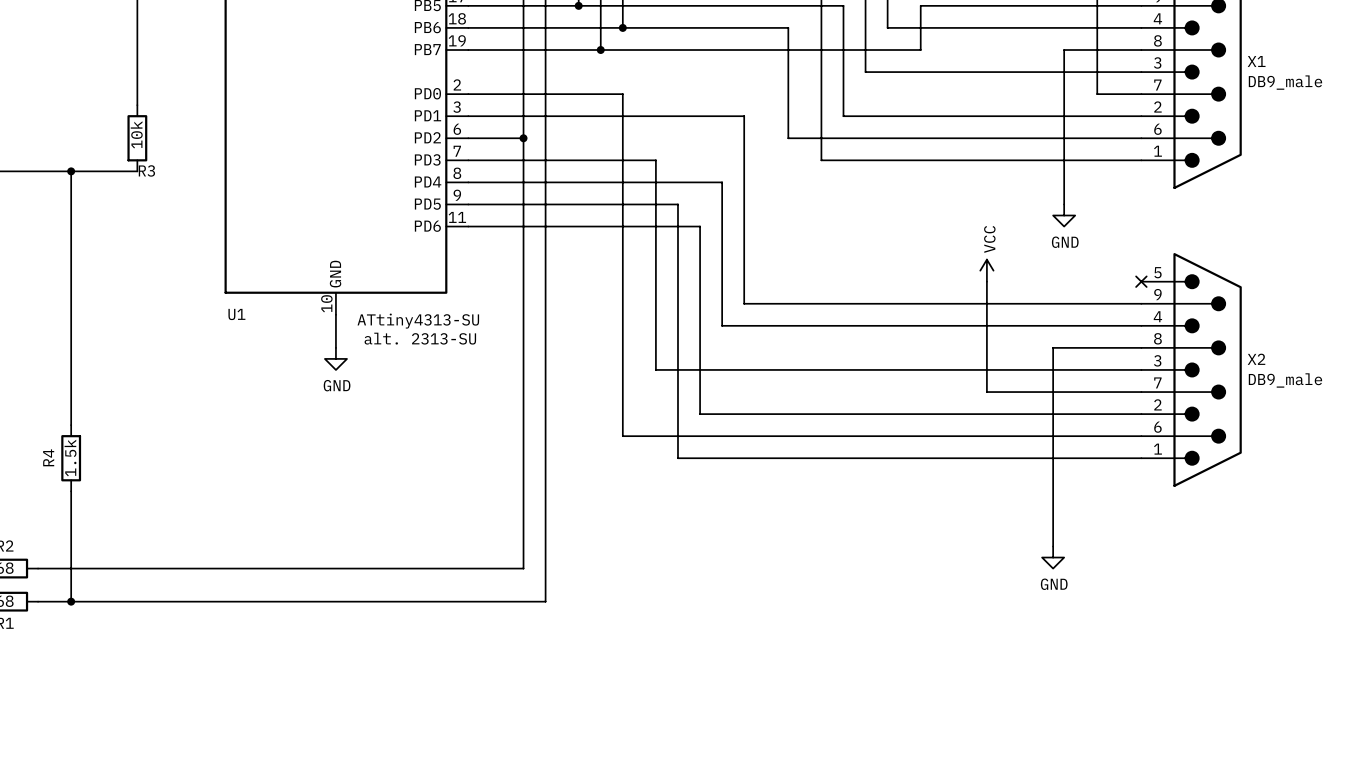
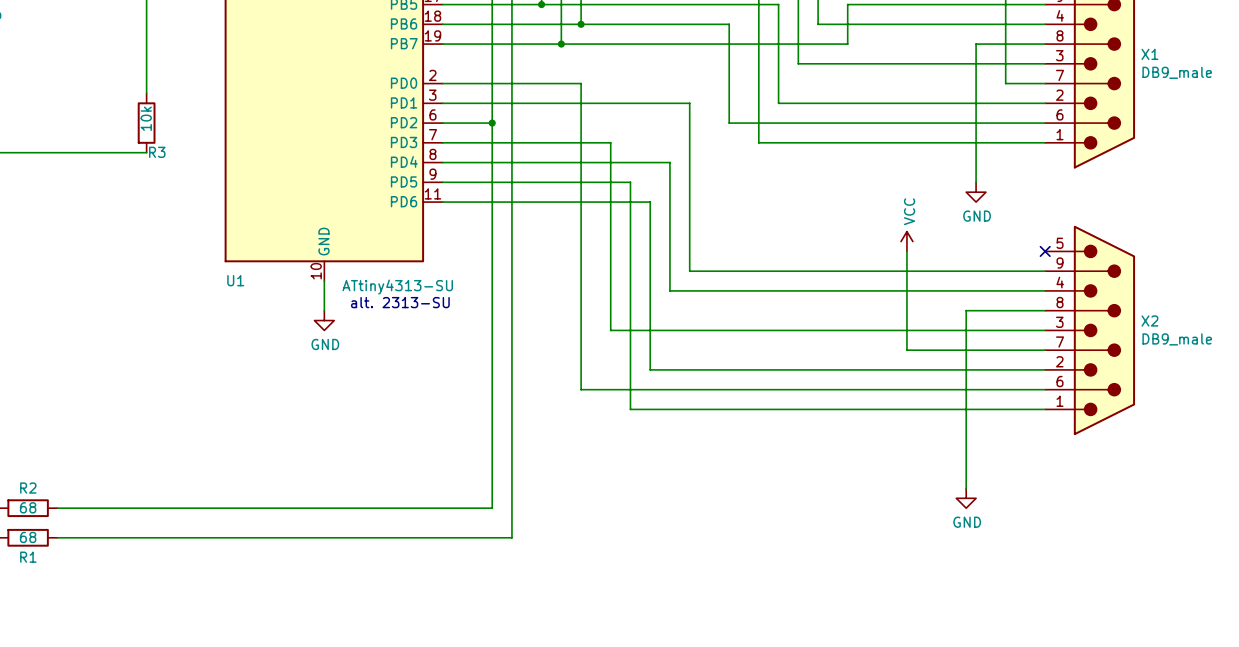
wire: (71, 171) (71, 425) -> none
junction: (71, 171) -> none
R4: 1.5k (71, 458) -> none
wire: (71, 491) (71, 601) -> none
junction: (71, 601) -> none

